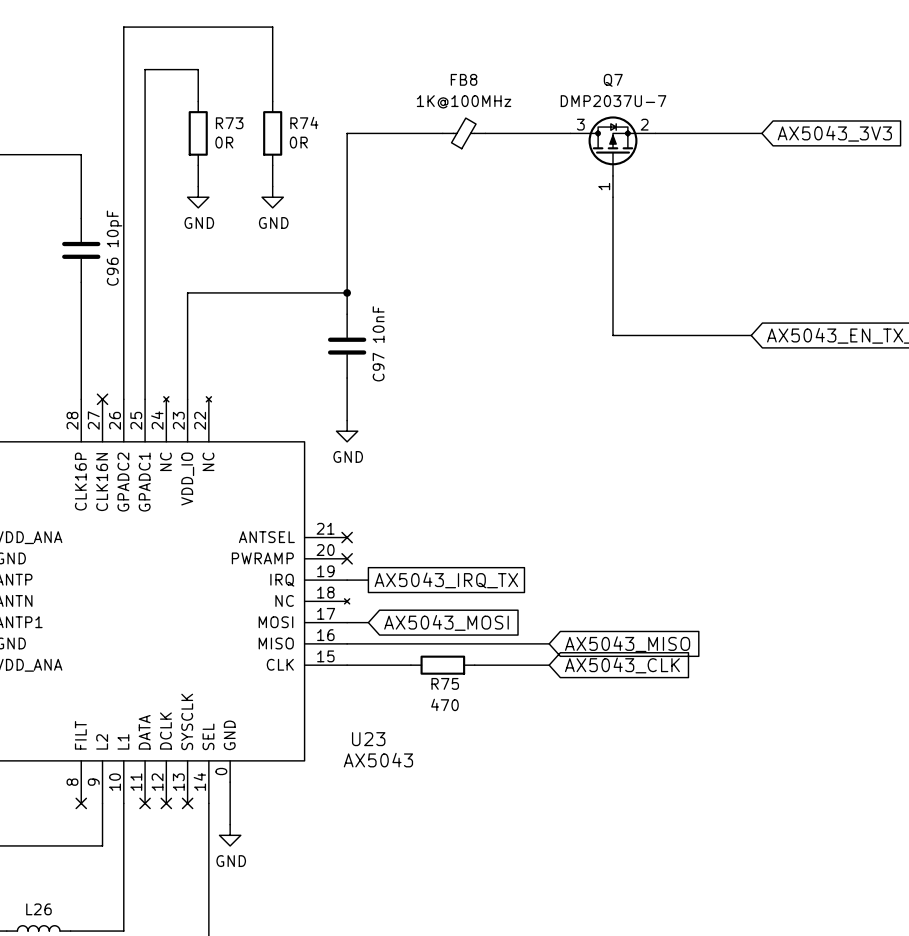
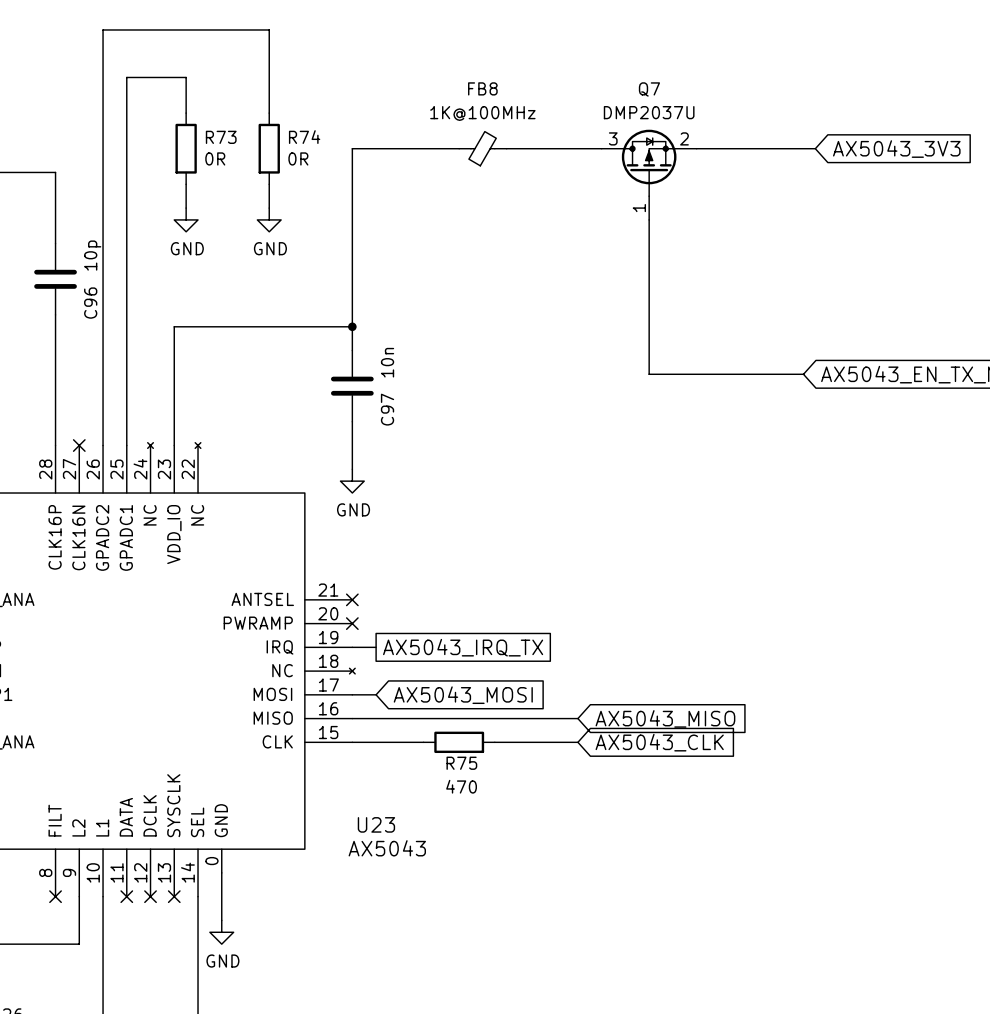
Q7 value: DMP2037U-7 (613, 101) -> DMP2037U (649, 112)
C96 value: 10pF (114, 228) -> 10p (92, 255)
C97 value: 10nF (378, 324) -> 10n (387, 362)

